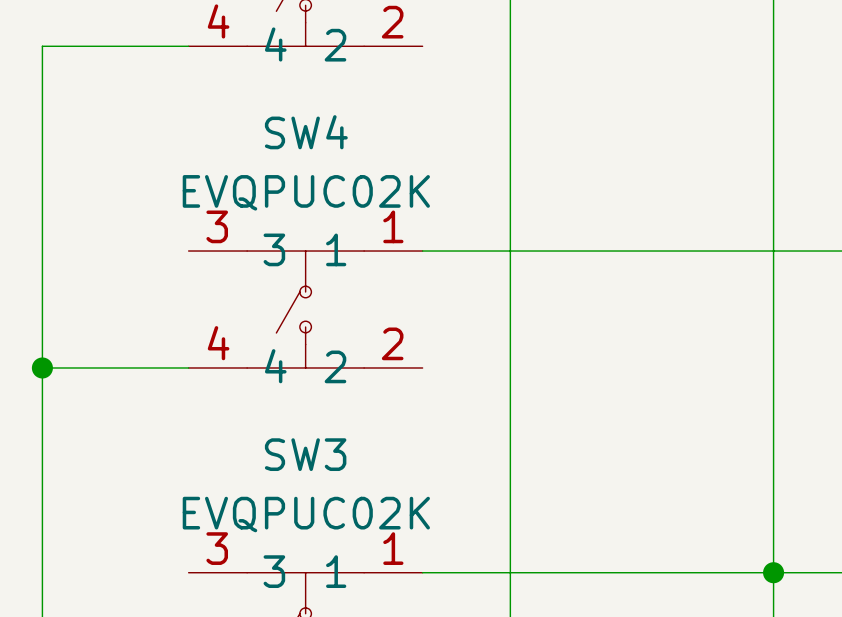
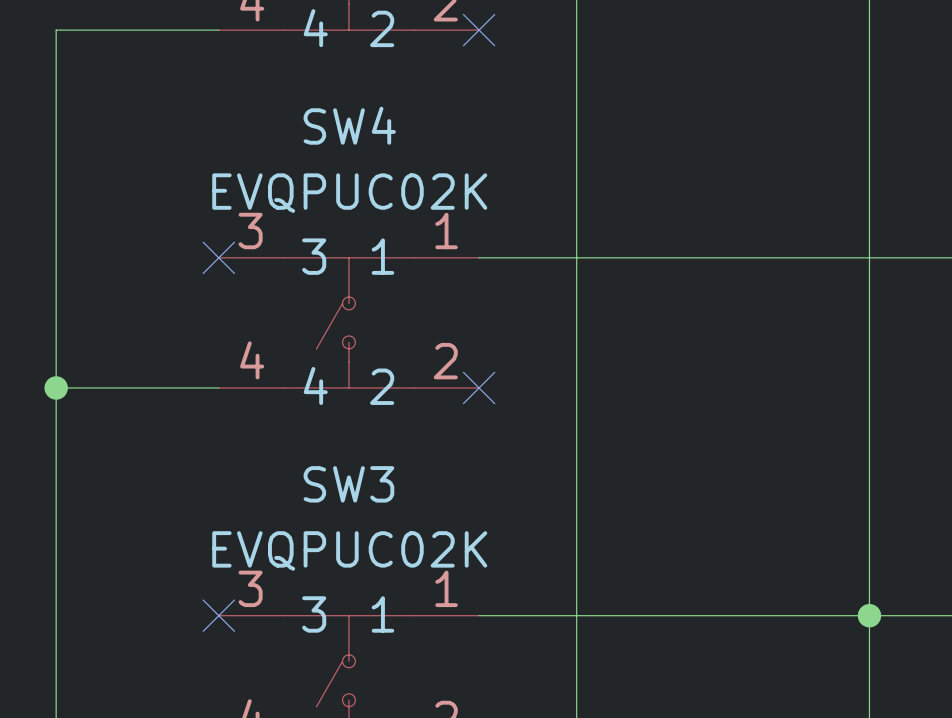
no-connect mark: none -> (479, 30)
no-connect mark: none -> (218, 257)
no-connect mark: none -> (479, 387)
no-connect mark: none -> (218, 615)

